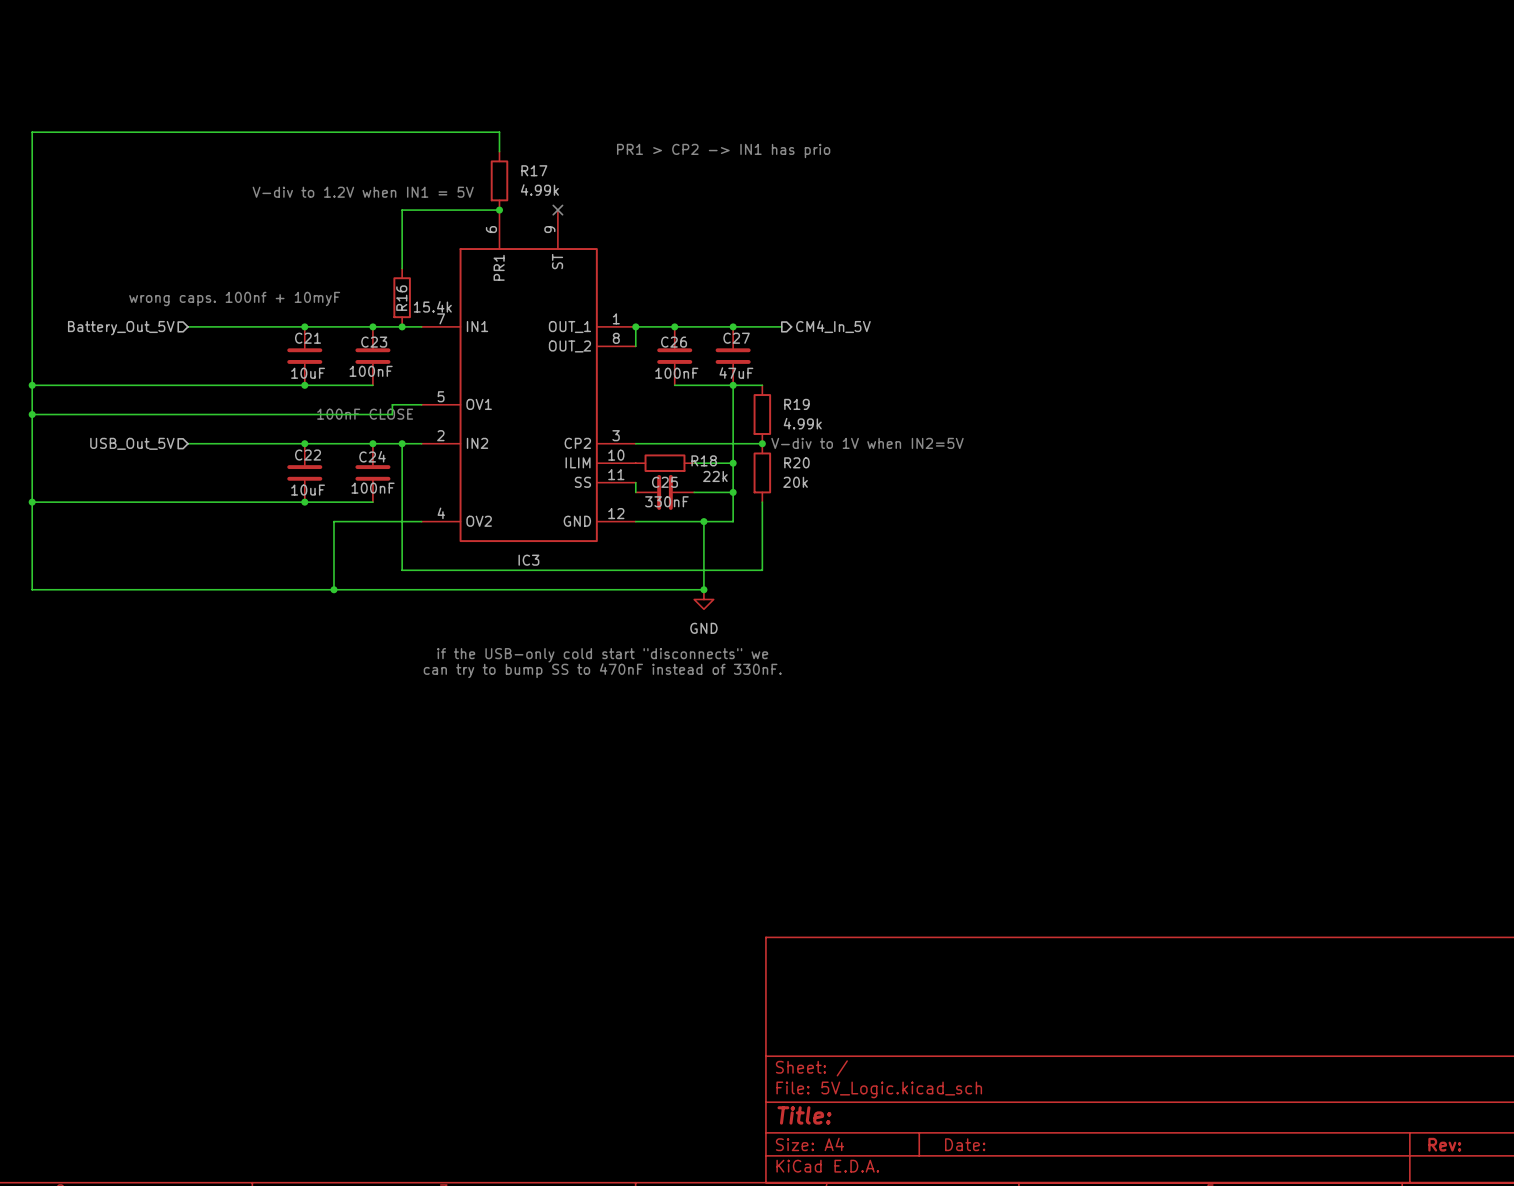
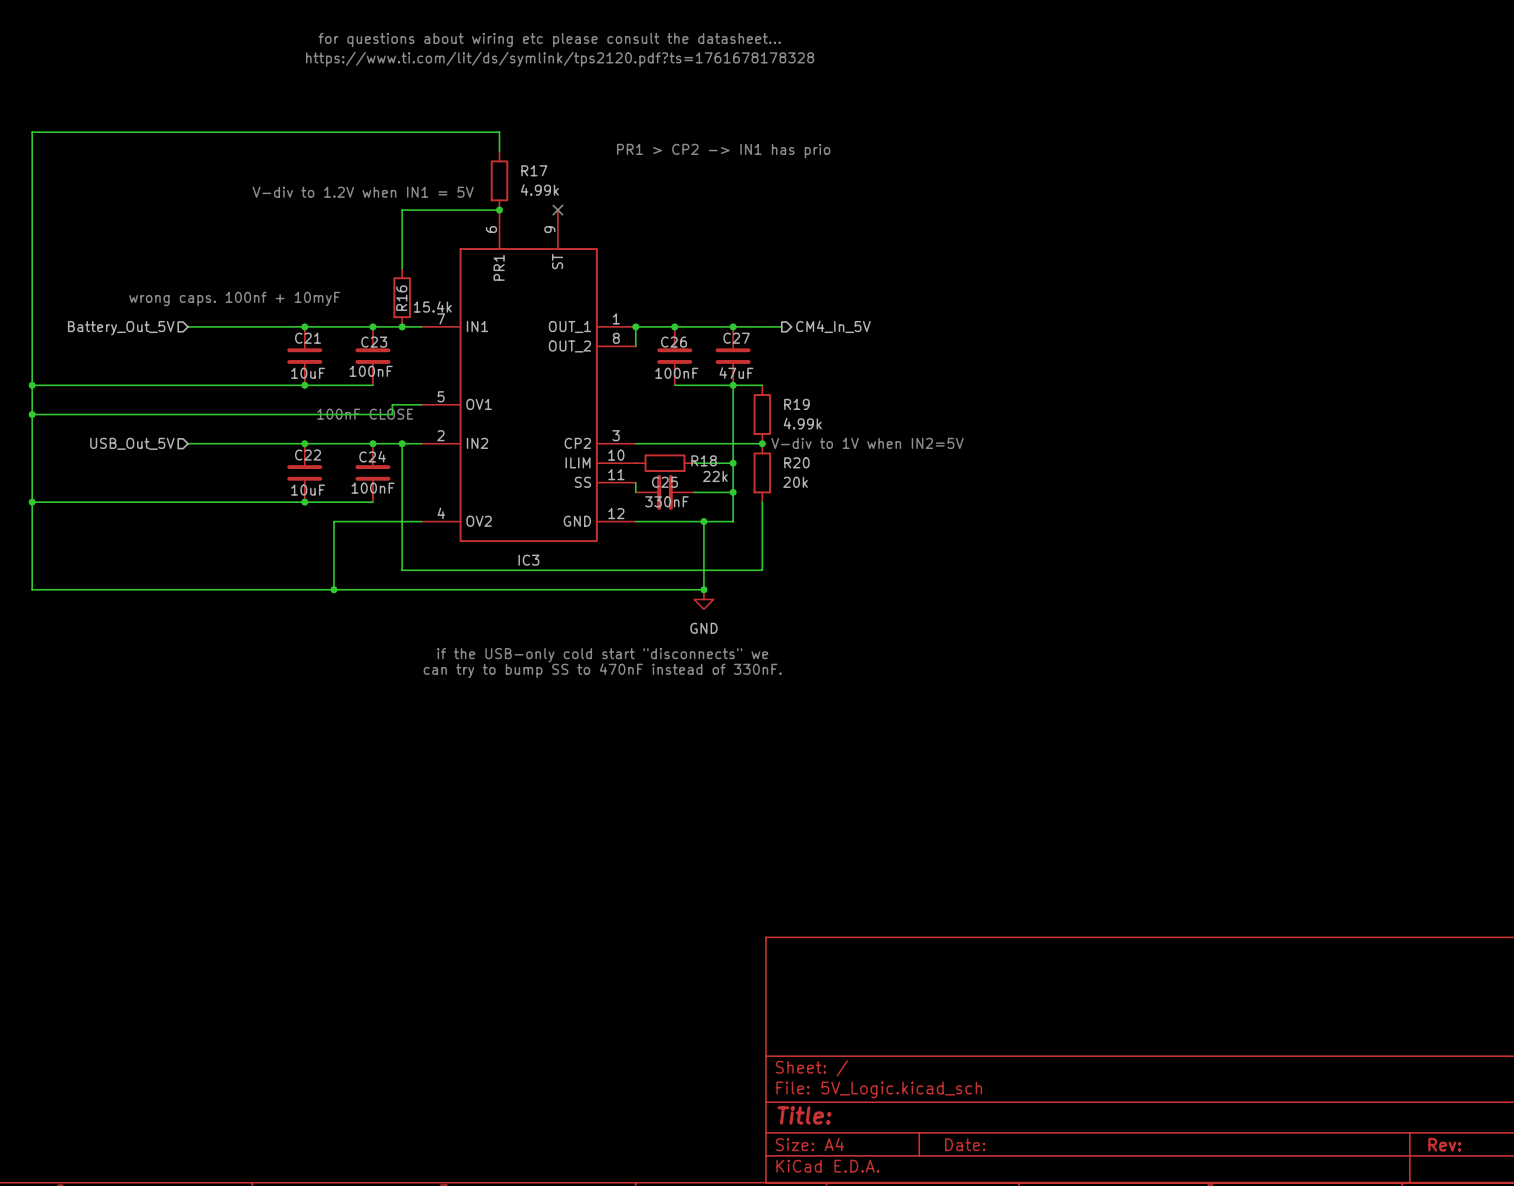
text: none -> for questions about wiring etc please consult the datasheet... (549, 40)
text: none -> https://www.ti.com/lit/ds/symlink/tps2120.pdf?ts=1761678178328 (560, 59)

